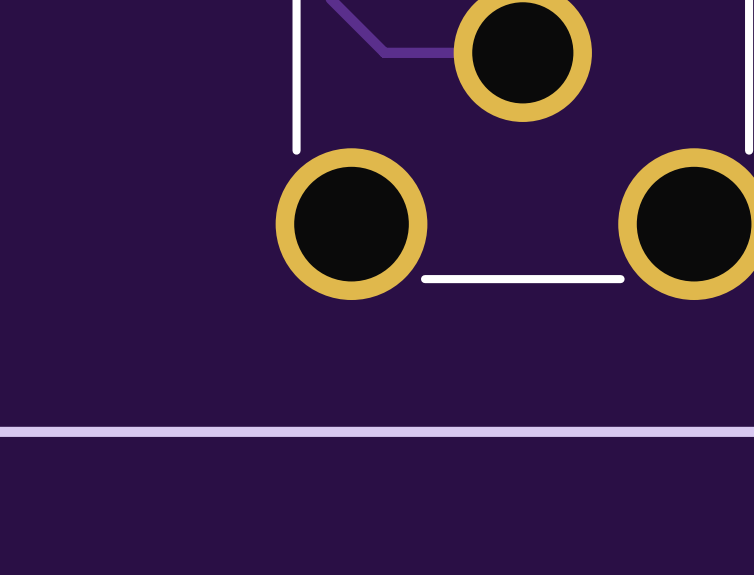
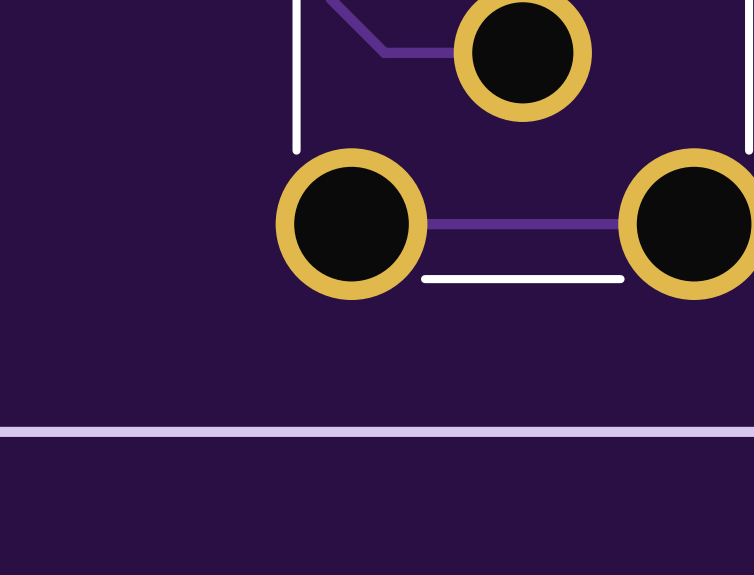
track: none -> (351, 224) (694, 224)

